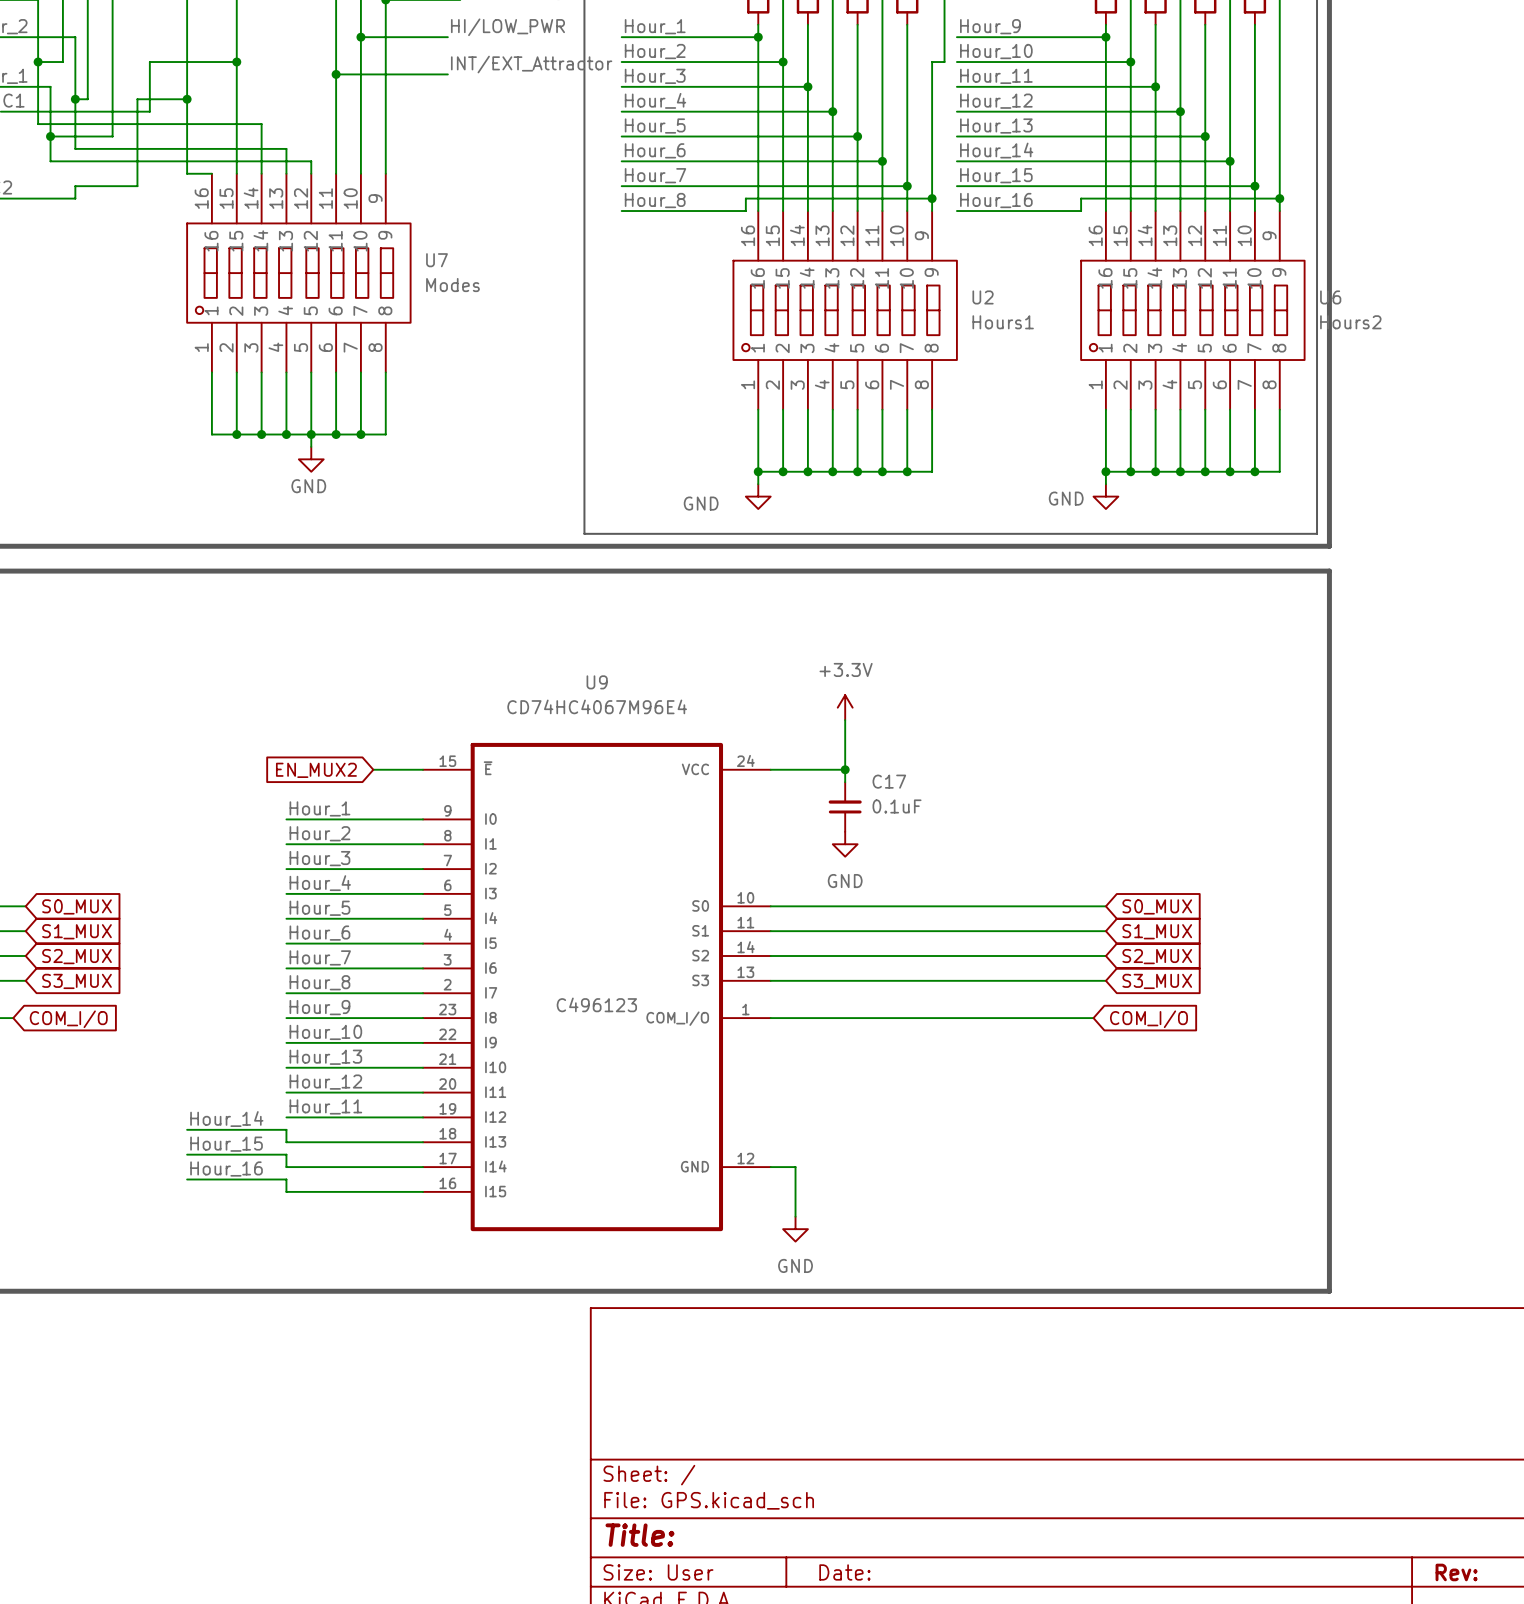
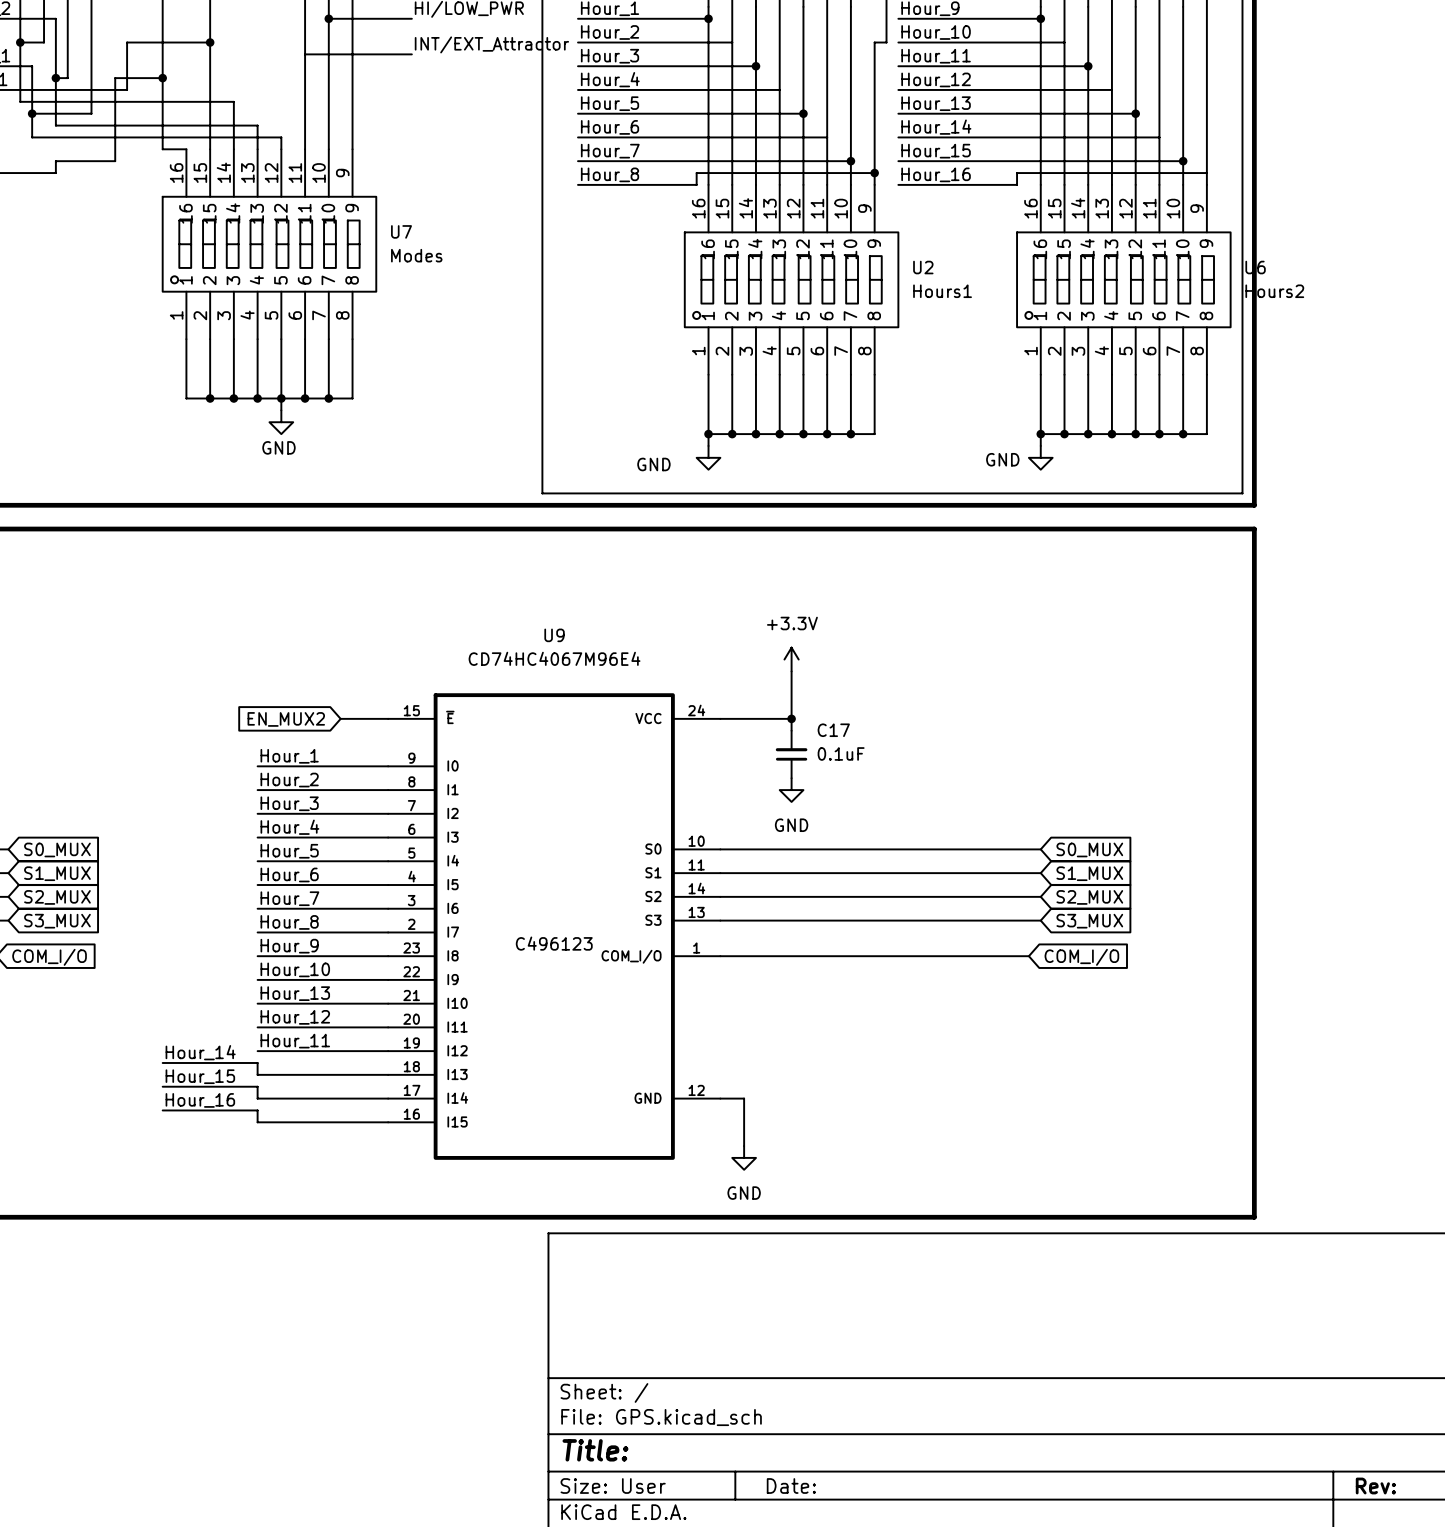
junction: (783, 62) -> none
junction: (1130, 62) -> none
junction: (336, 74) -> none
junction: (832, 111) -> none
junction: (1180, 111) -> none
junction: (882, 161) -> none
junction: (1230, 161) -> none
junction: (1279, 198) -> none

